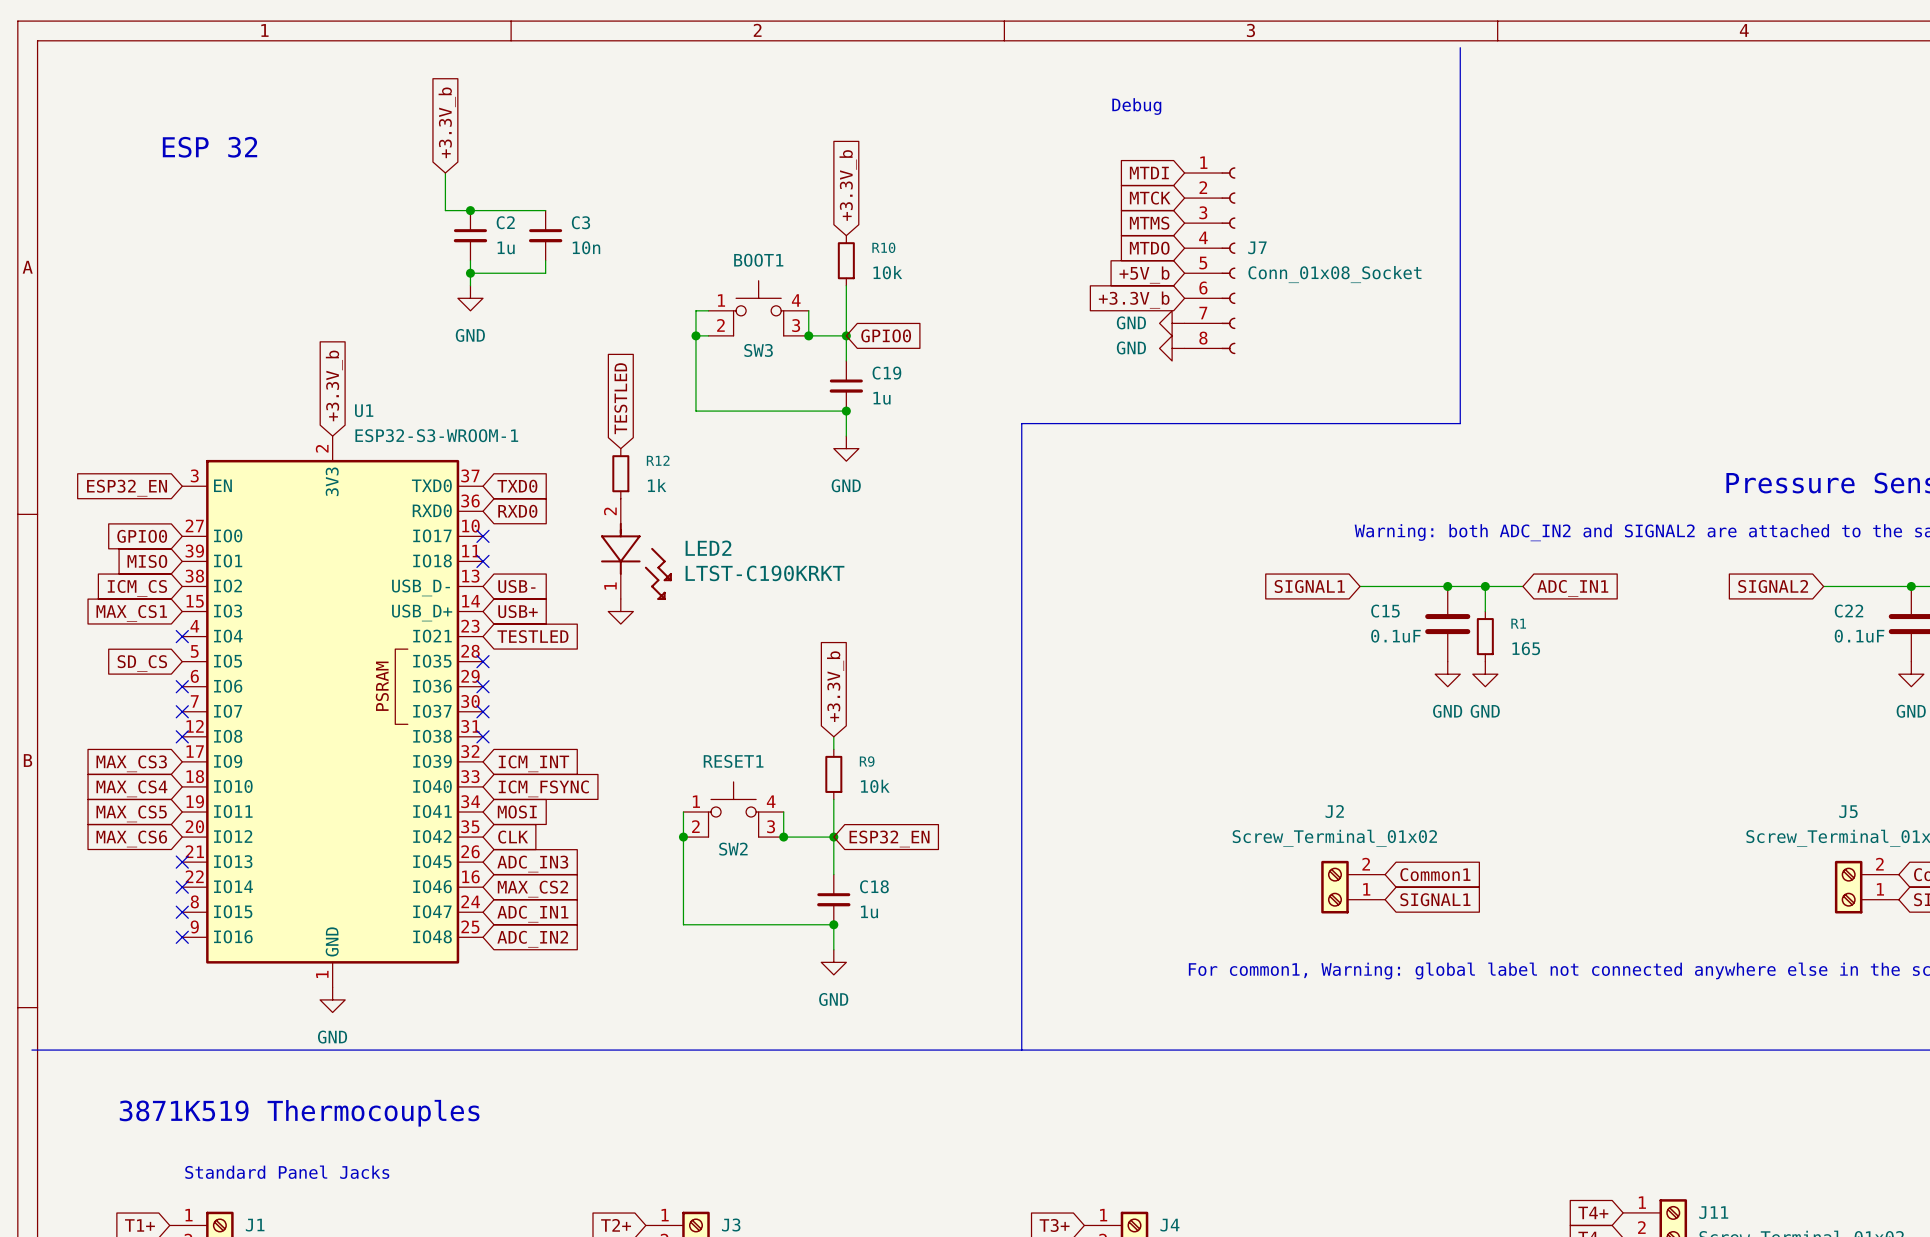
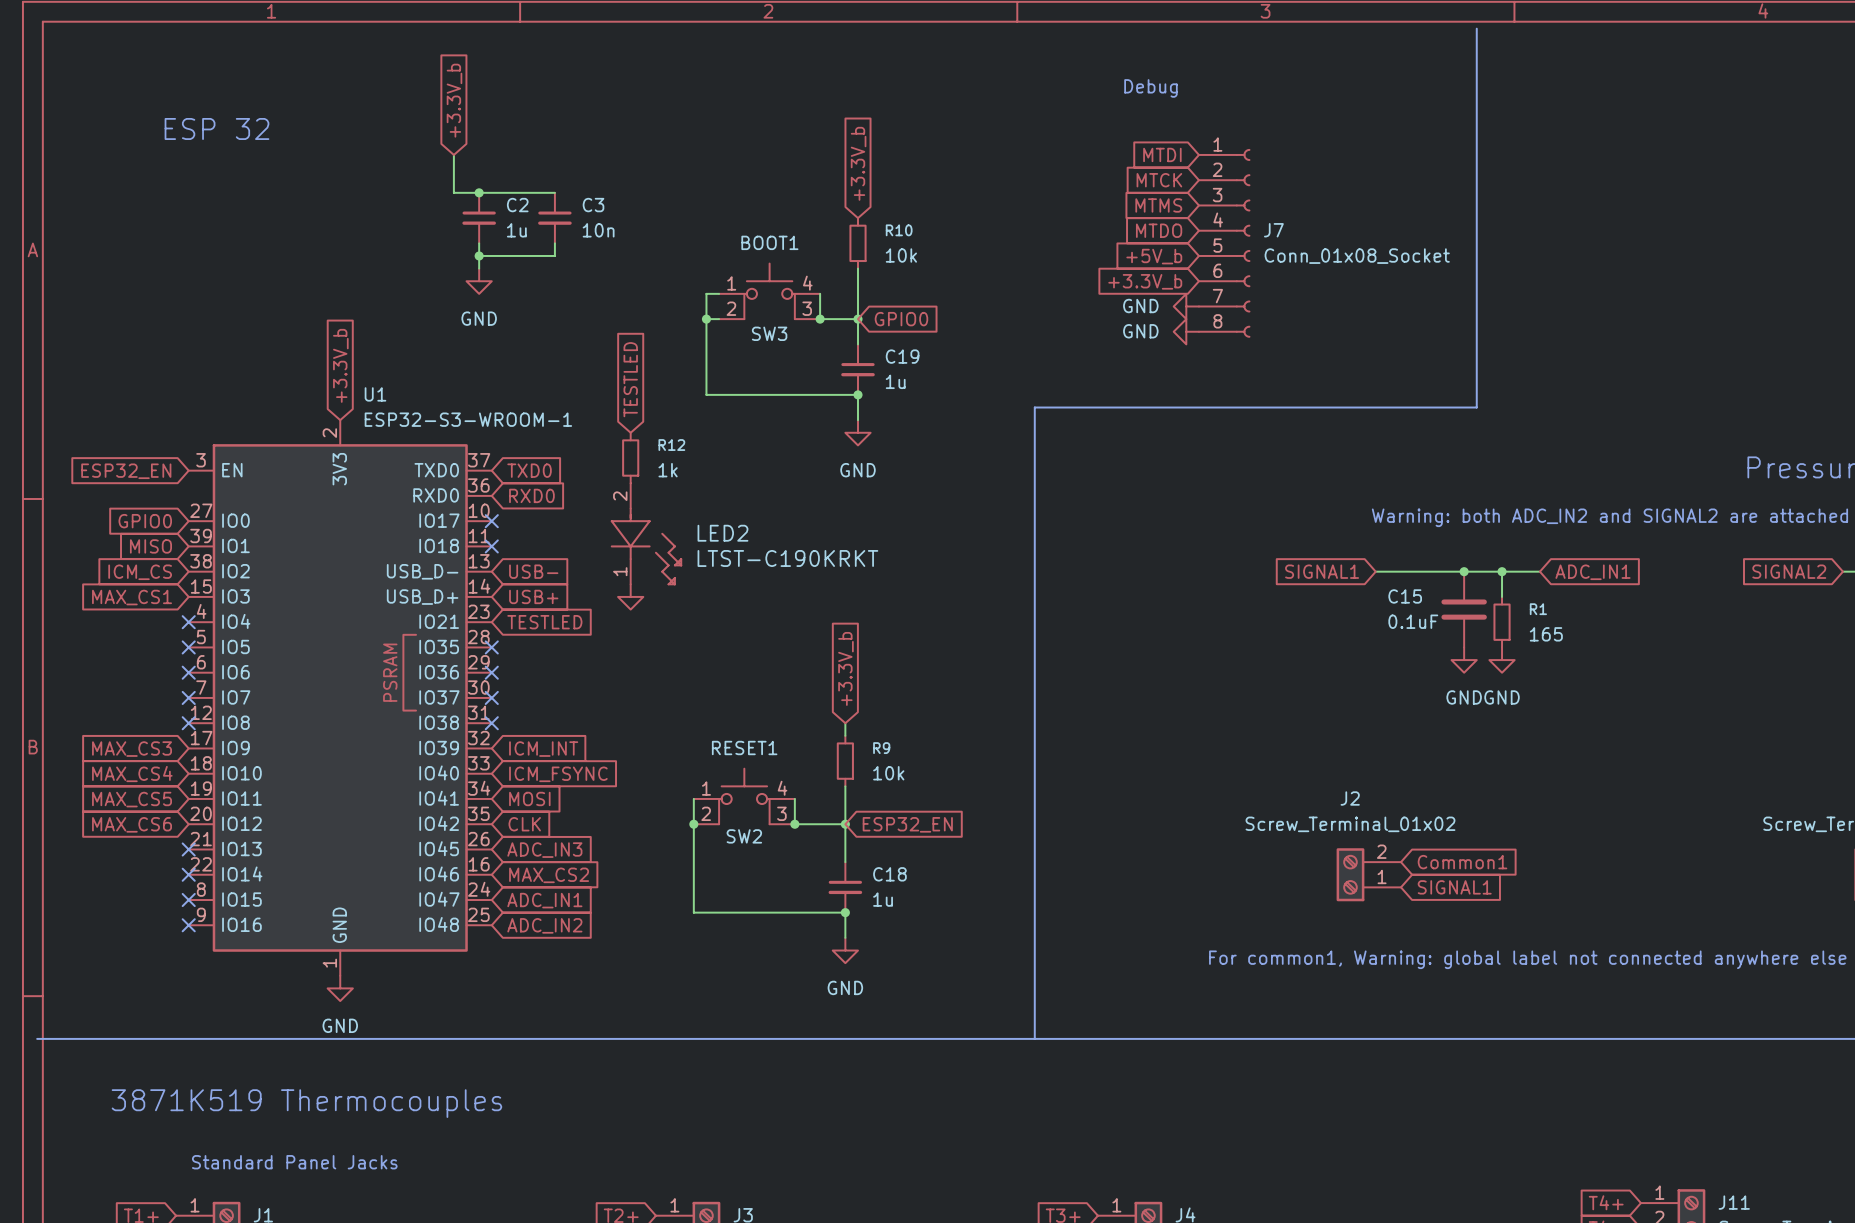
no-connect mark: none -> (188, 647)
global label: SD_CS (142, 663) -> none

